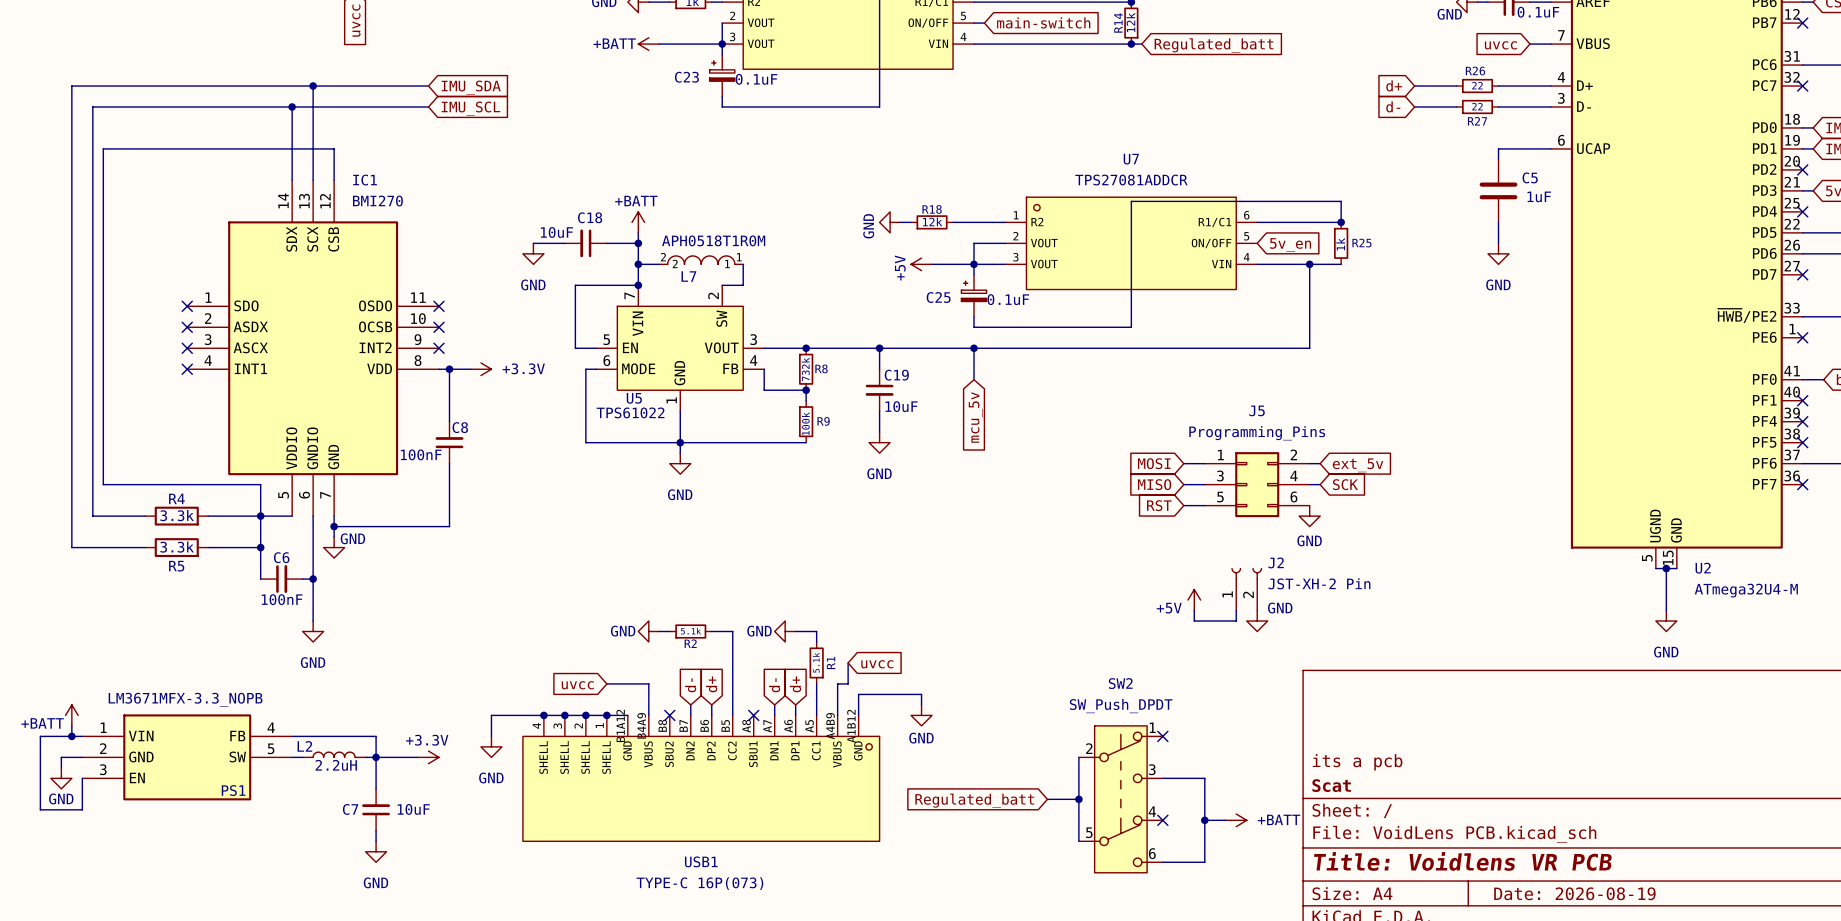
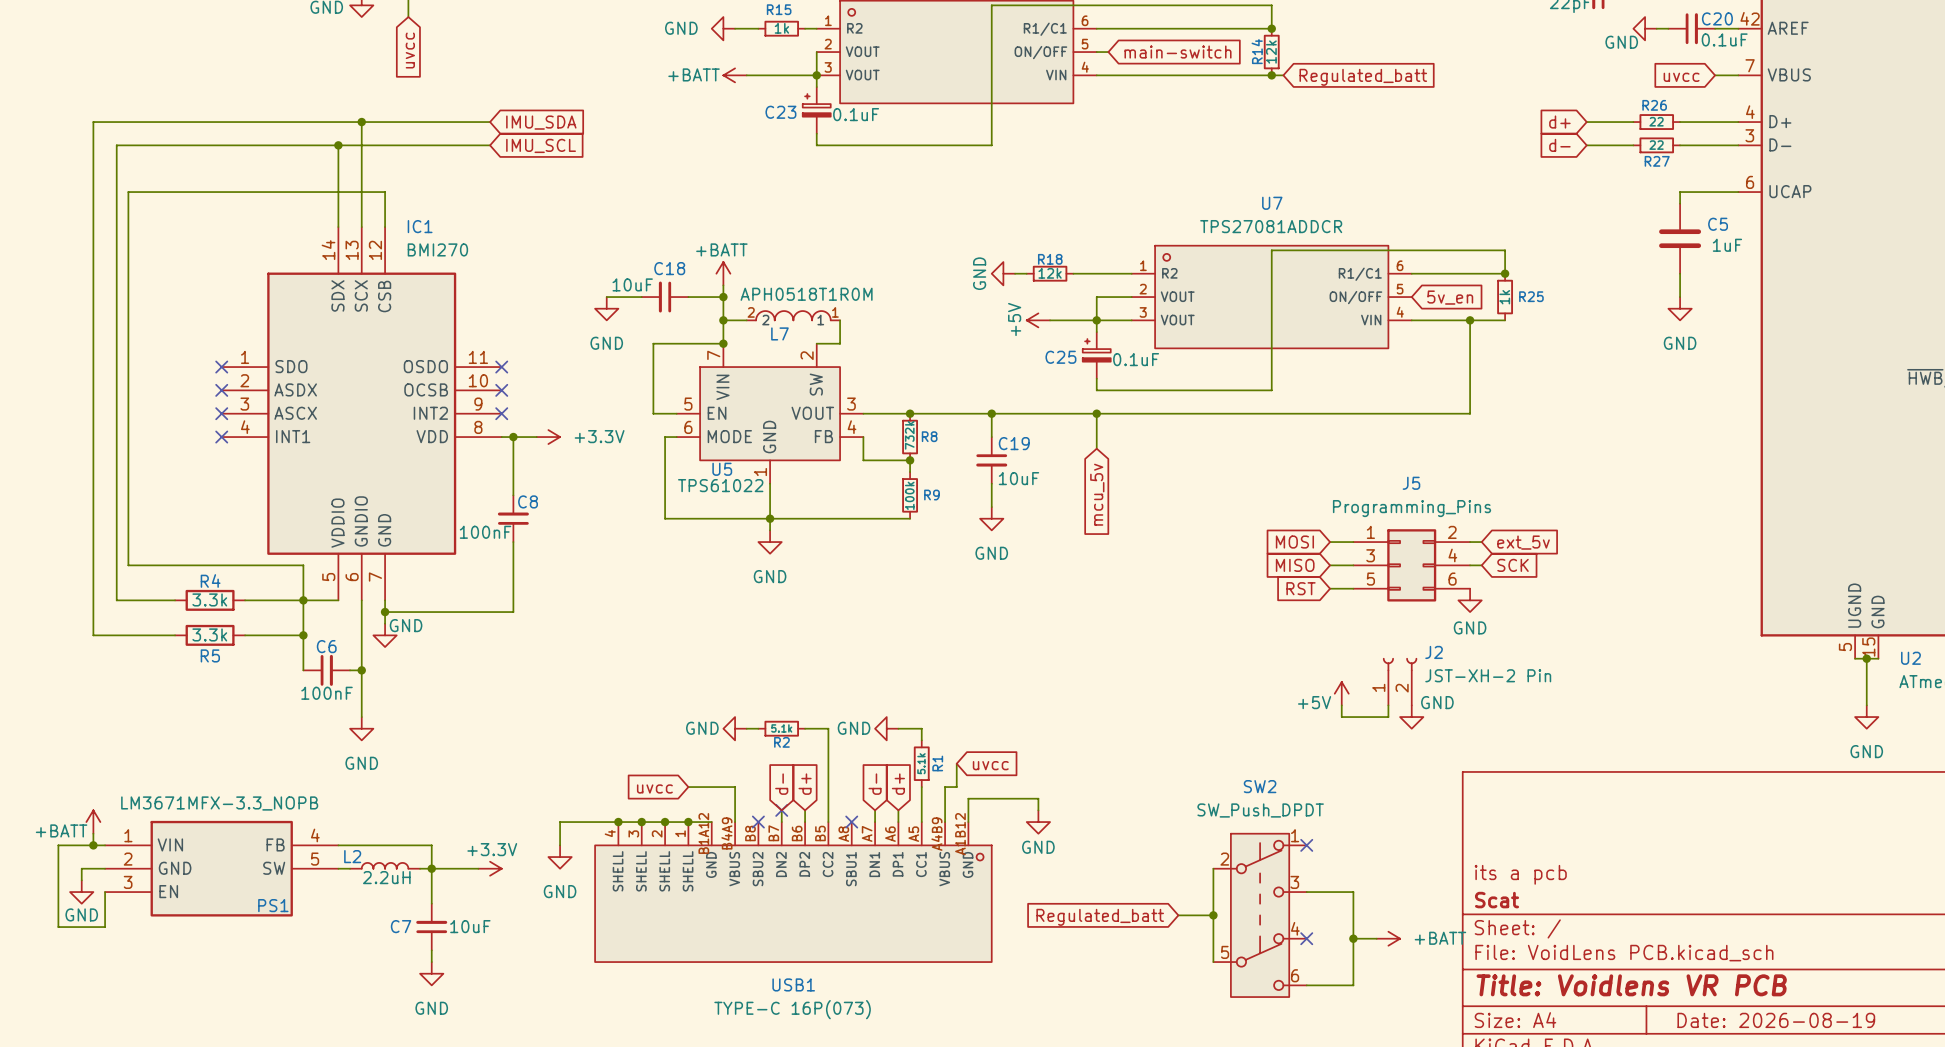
no-connect mark: none -> (781, 810)

